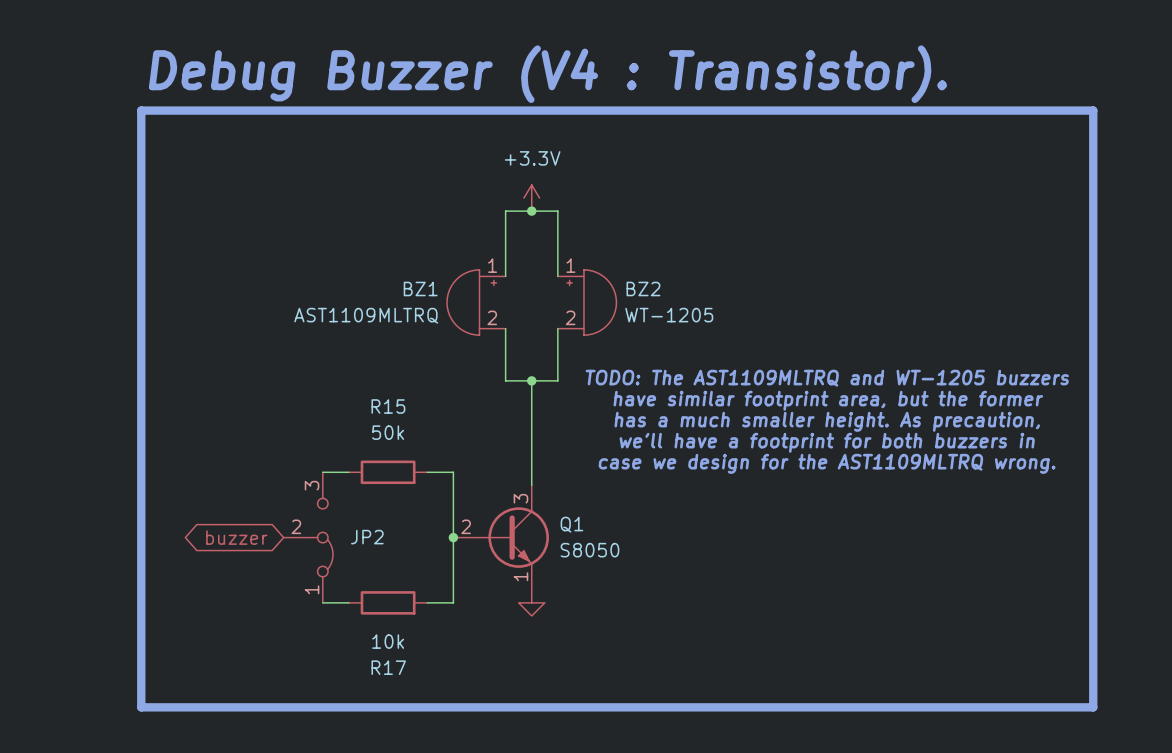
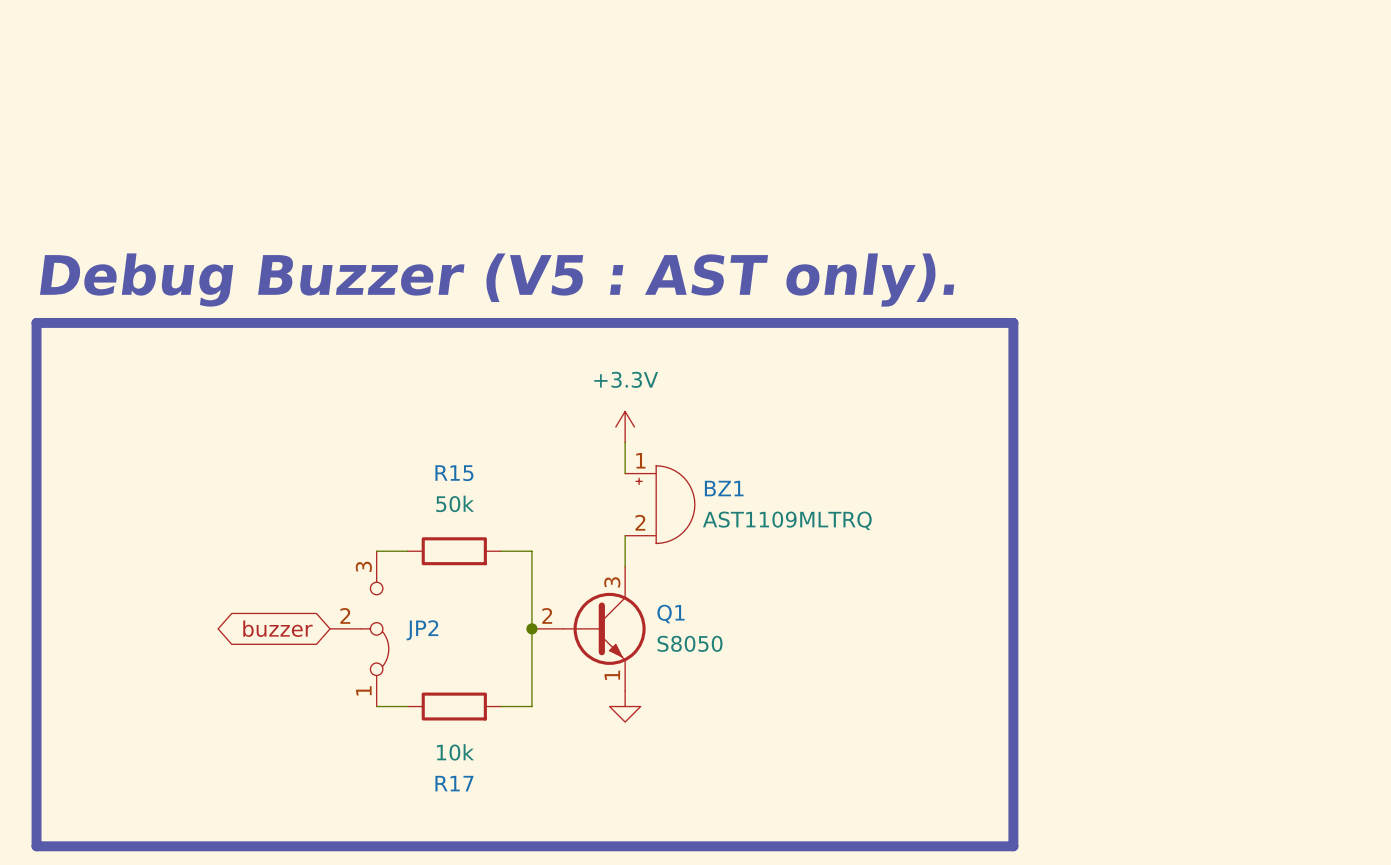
text: Debug Buzzer (V4 : Transistor). (548, 74) -> none
line: (141, 110) (1093, 110) (1093, 707) (141, 707) (141, 110) -> none
power symbol position: +3.3V (531, 198) -> +3.3V (625, 427)
junction: (531, 211) -> none
text: none -> Debug Buzzer (V5 : AST only). (497, 280)
wire: (505, 276) (505, 211) (557, 211) (557, 276) -> none
line: none -> (36, 322) (1013, 322) (1013, 846) (36, 846) (36, 322)
BZ1 flip: as is (471, 302) -> left-right (665, 504)
BZ1 position: (476, 302) -> (659, 504)
BZ2: WT-1205 (587, 302) -> none
wire: (505, 328) (505, 380) (557, 380) (557, 328) -> none
text: TODO: The AST1109MLTRQ and WT-1205 buzzers (827, 378) -> none
junction: (531, 380) -> none
text: have similar footprint area, but the former (828, 400) -> none
wire: (531, 407) (531, 459) -> none
text: has a much smaller height. As precaution, (827, 421) -> none
text: we'll have a footprint for both buzzers in (827, 442) -> none
text: case we design for the AST1109MLTRQ wrong. (827, 463) -> none

